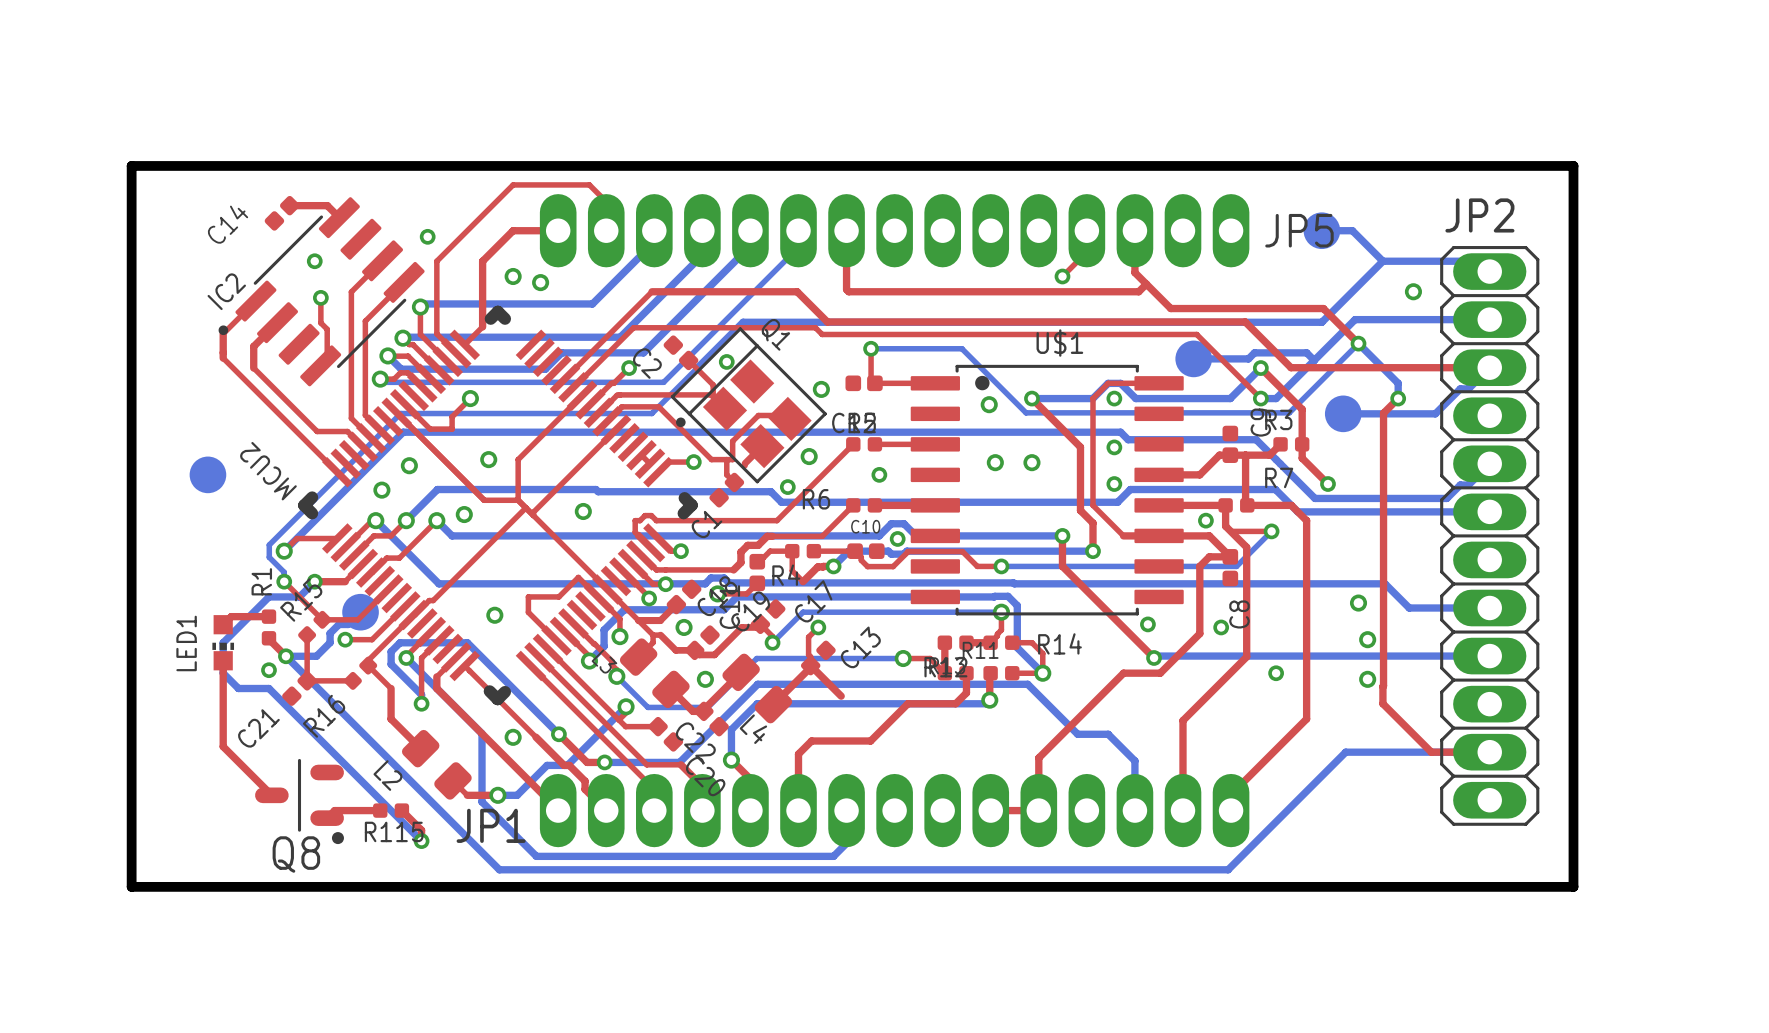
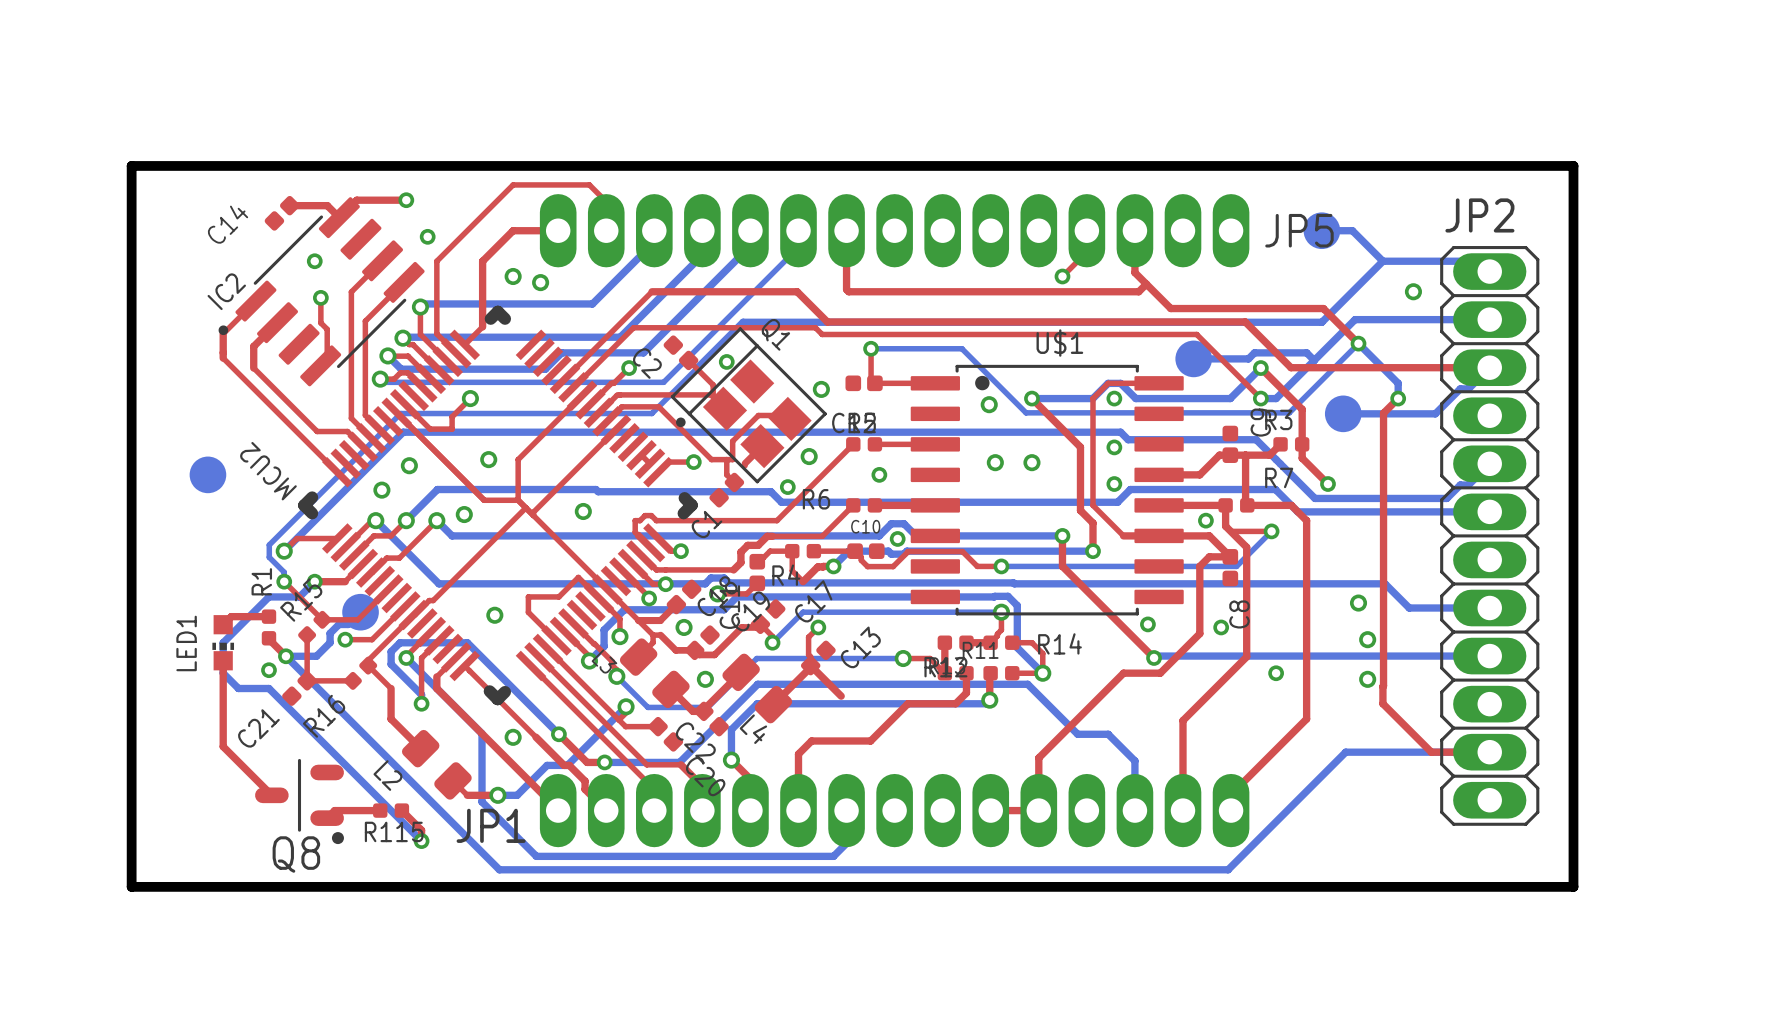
top track: none -> (406, 200) (356, 200) (339, 217)
via: none -> (406, 200)

